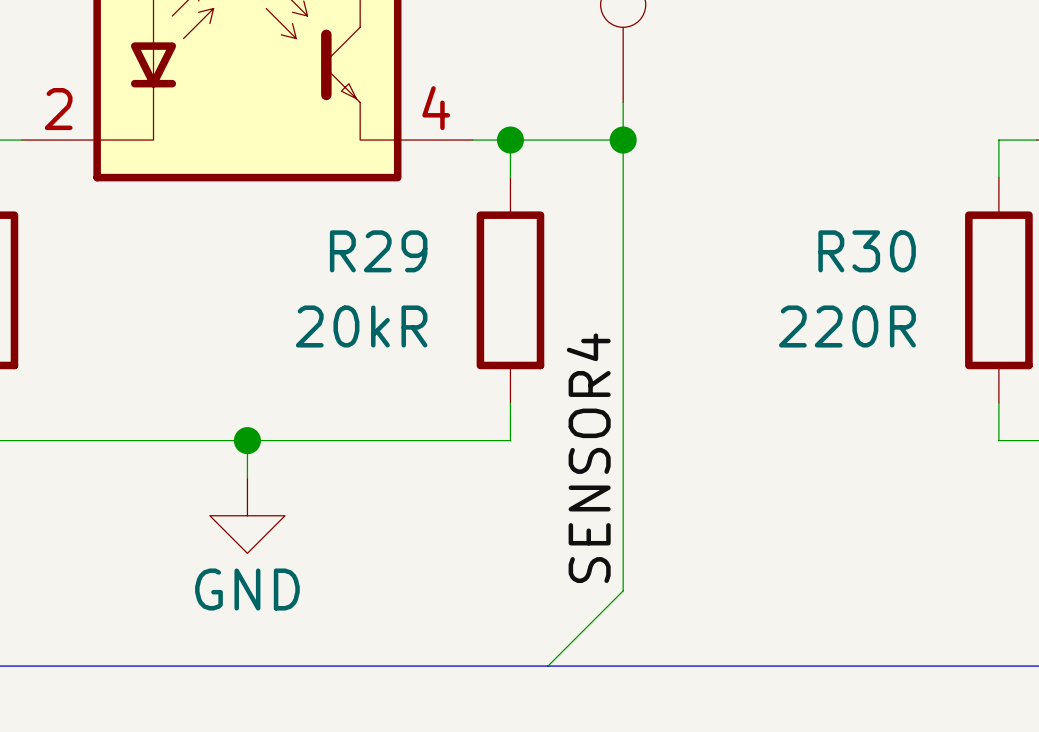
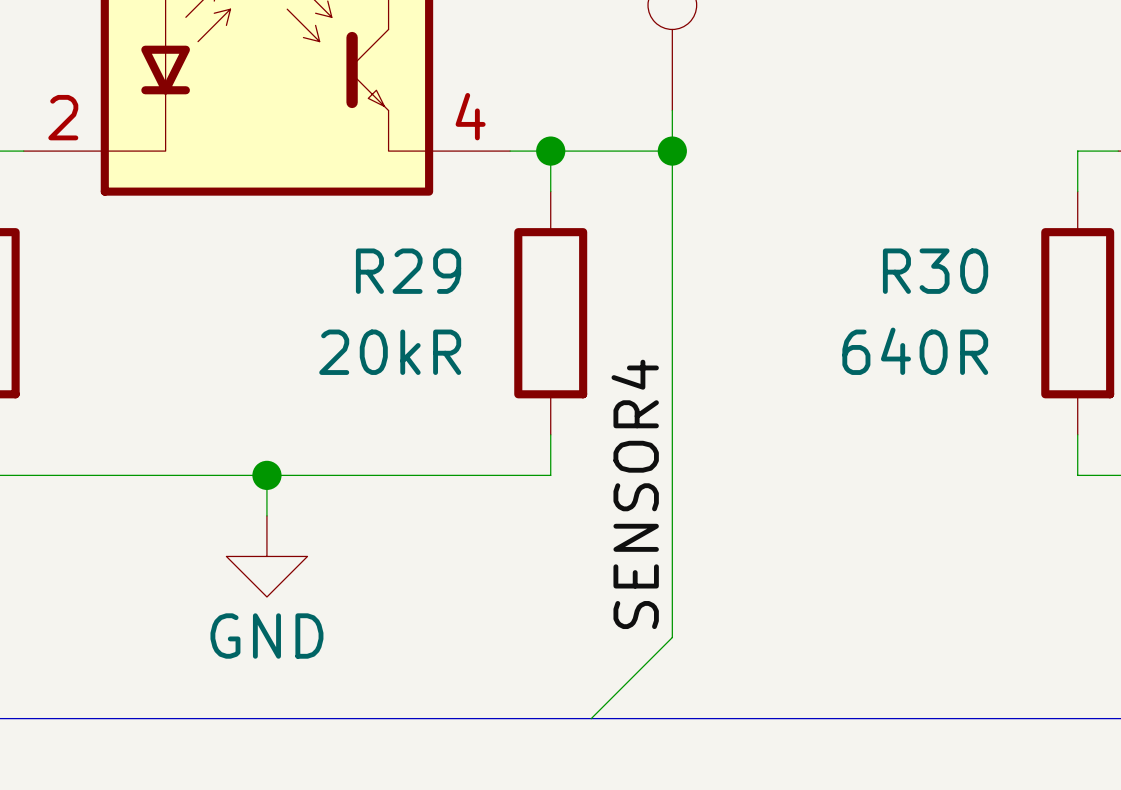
R30 value: 220R (847, 326) -> 640R (915, 351)

